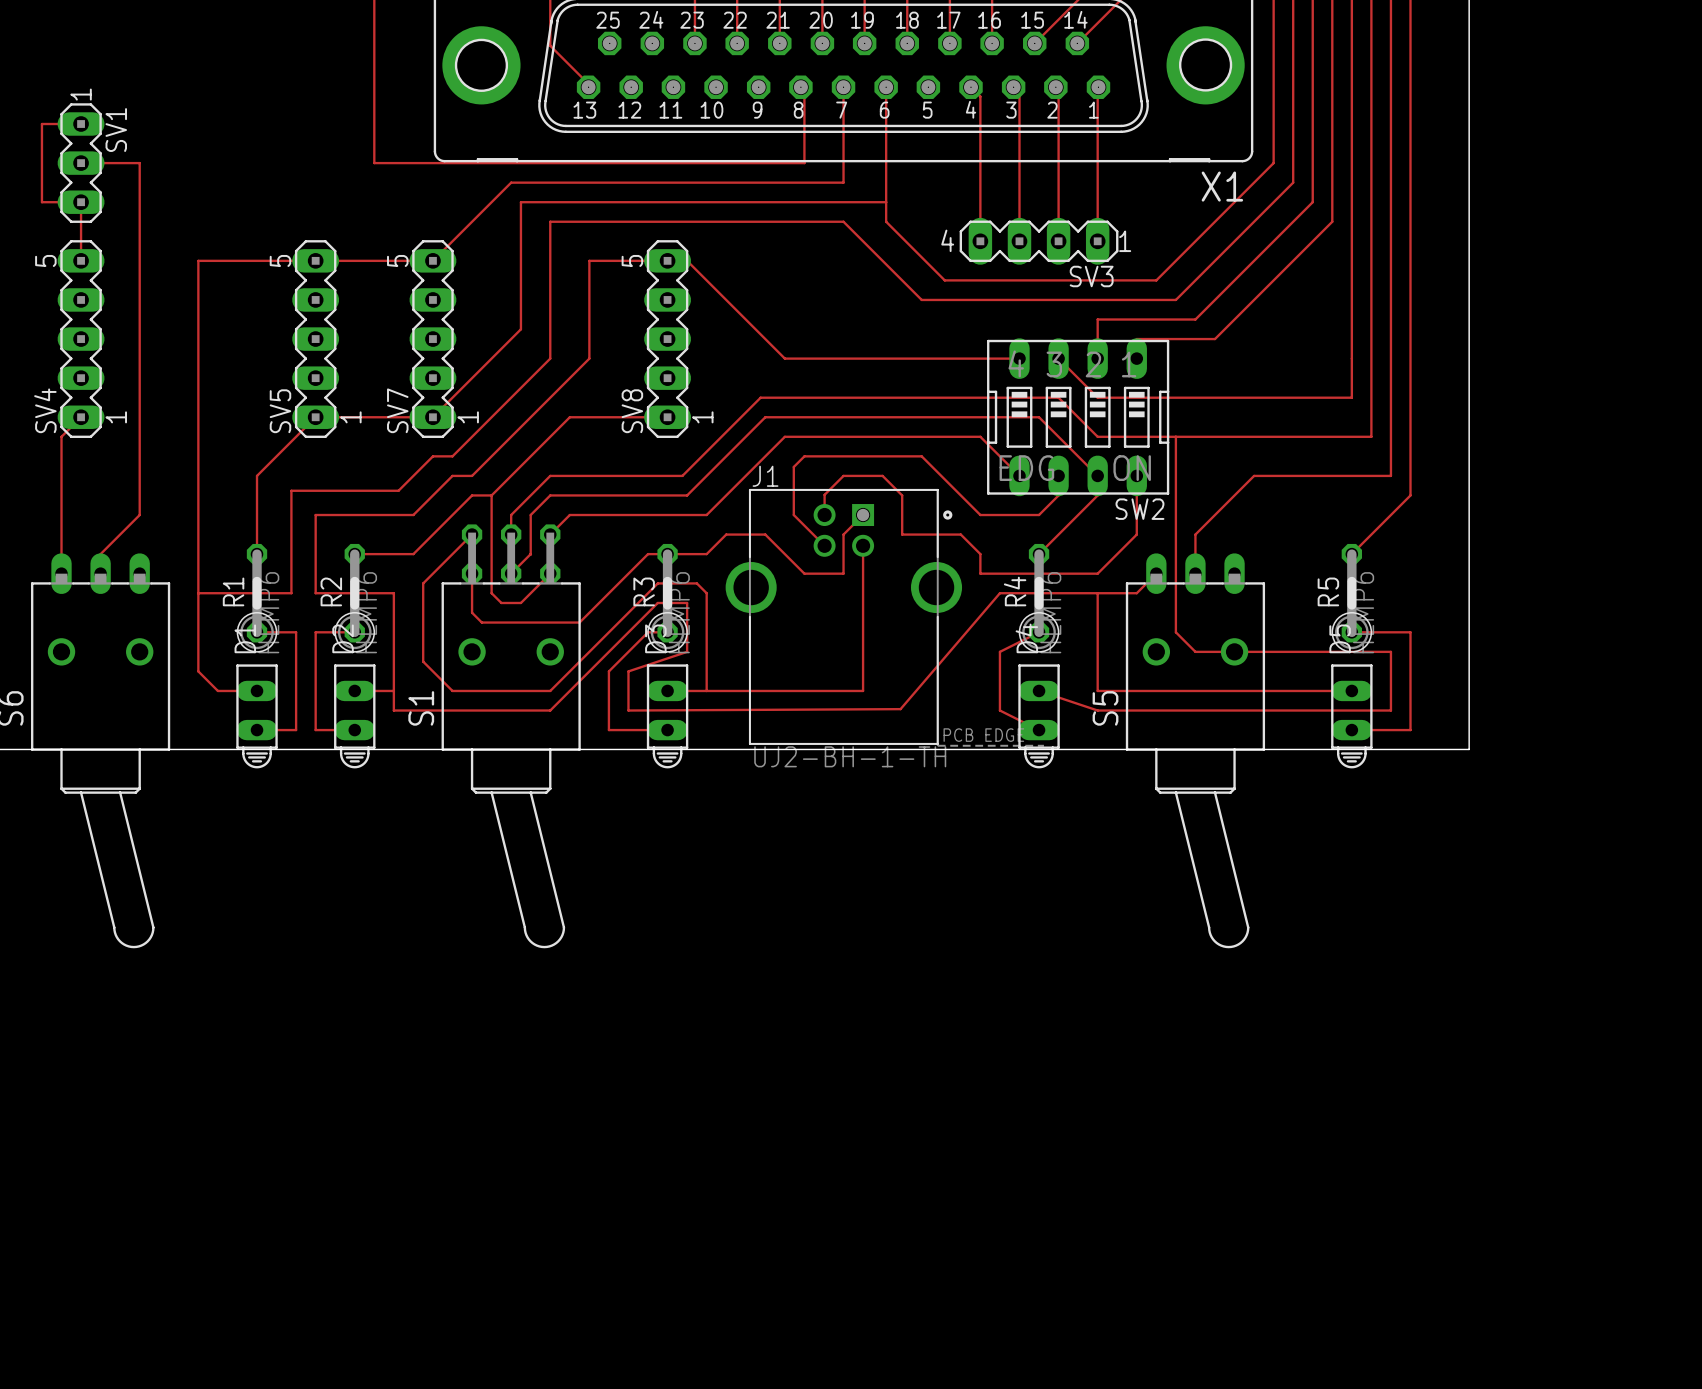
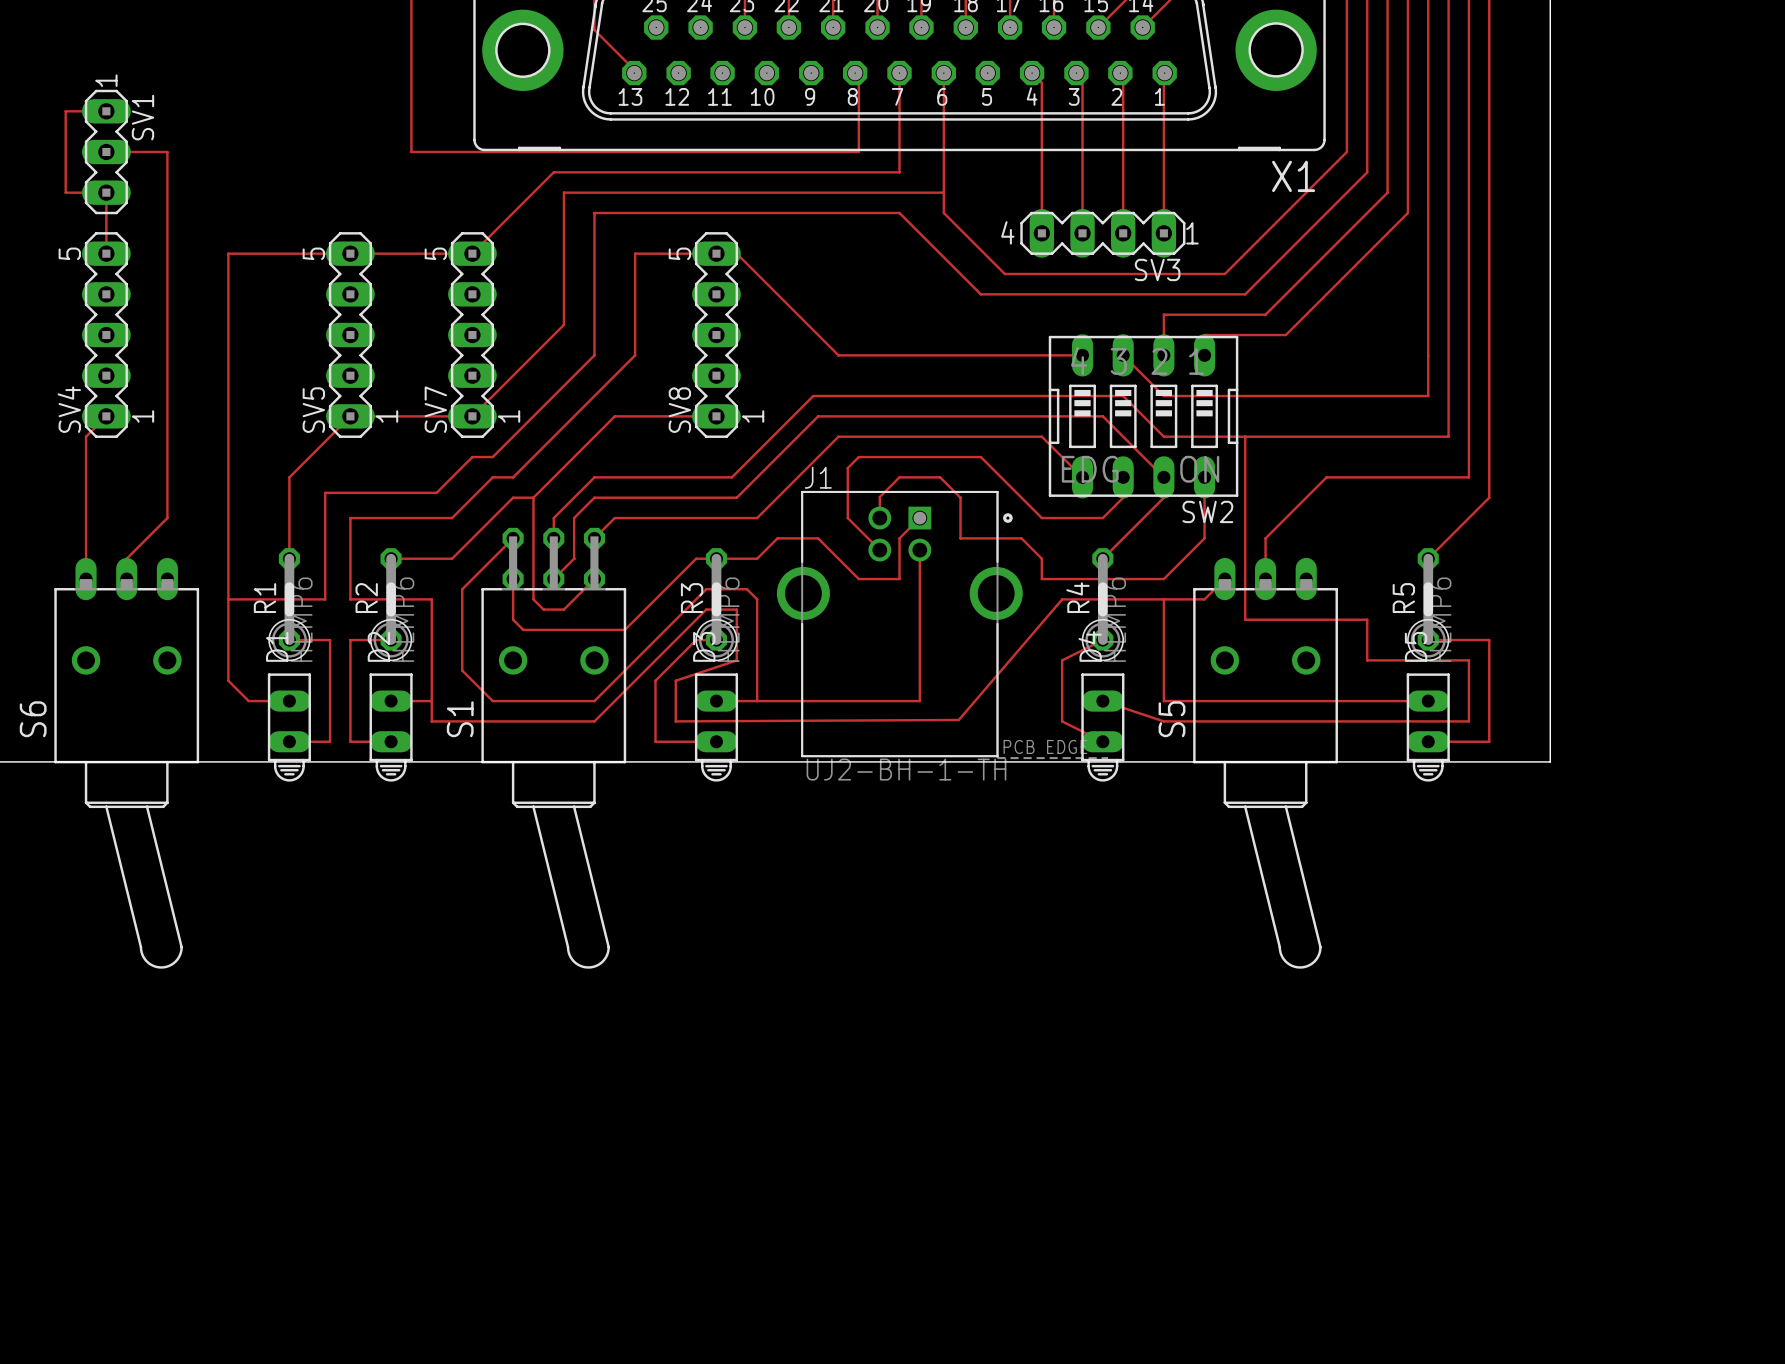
top track: (1175, 612) (1175, 632) (1195, 651) (1293, 651) -> (1245, 619) (1367, 619) (1367, 660)

